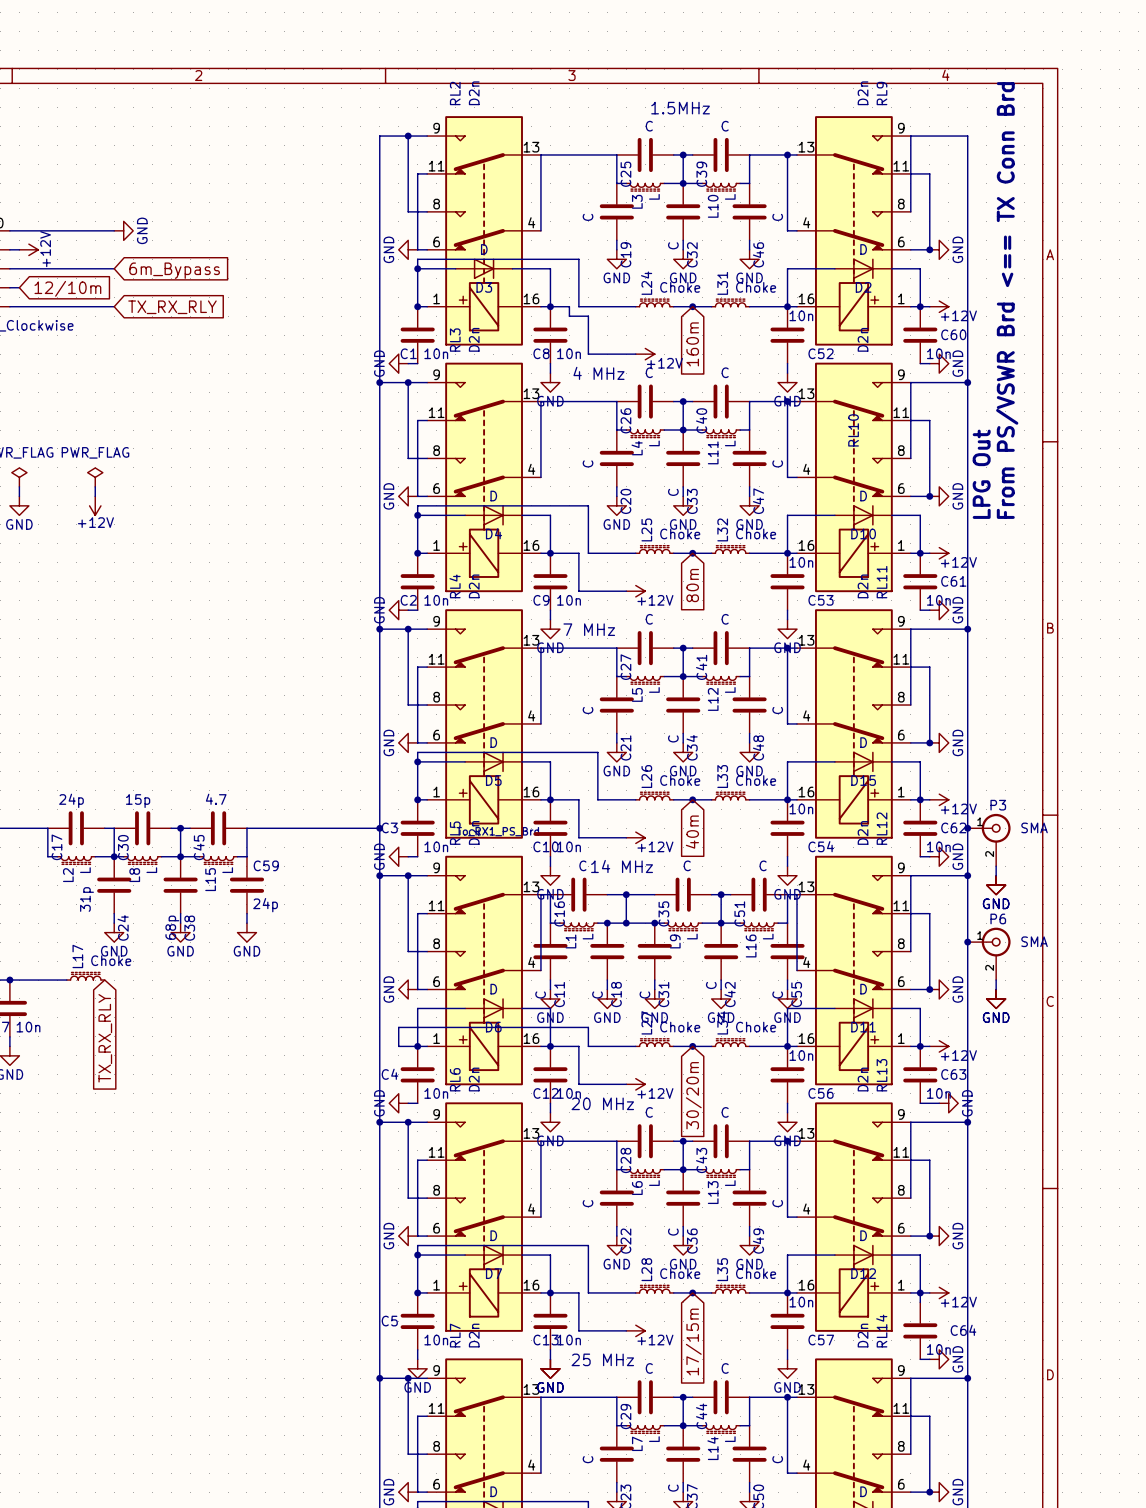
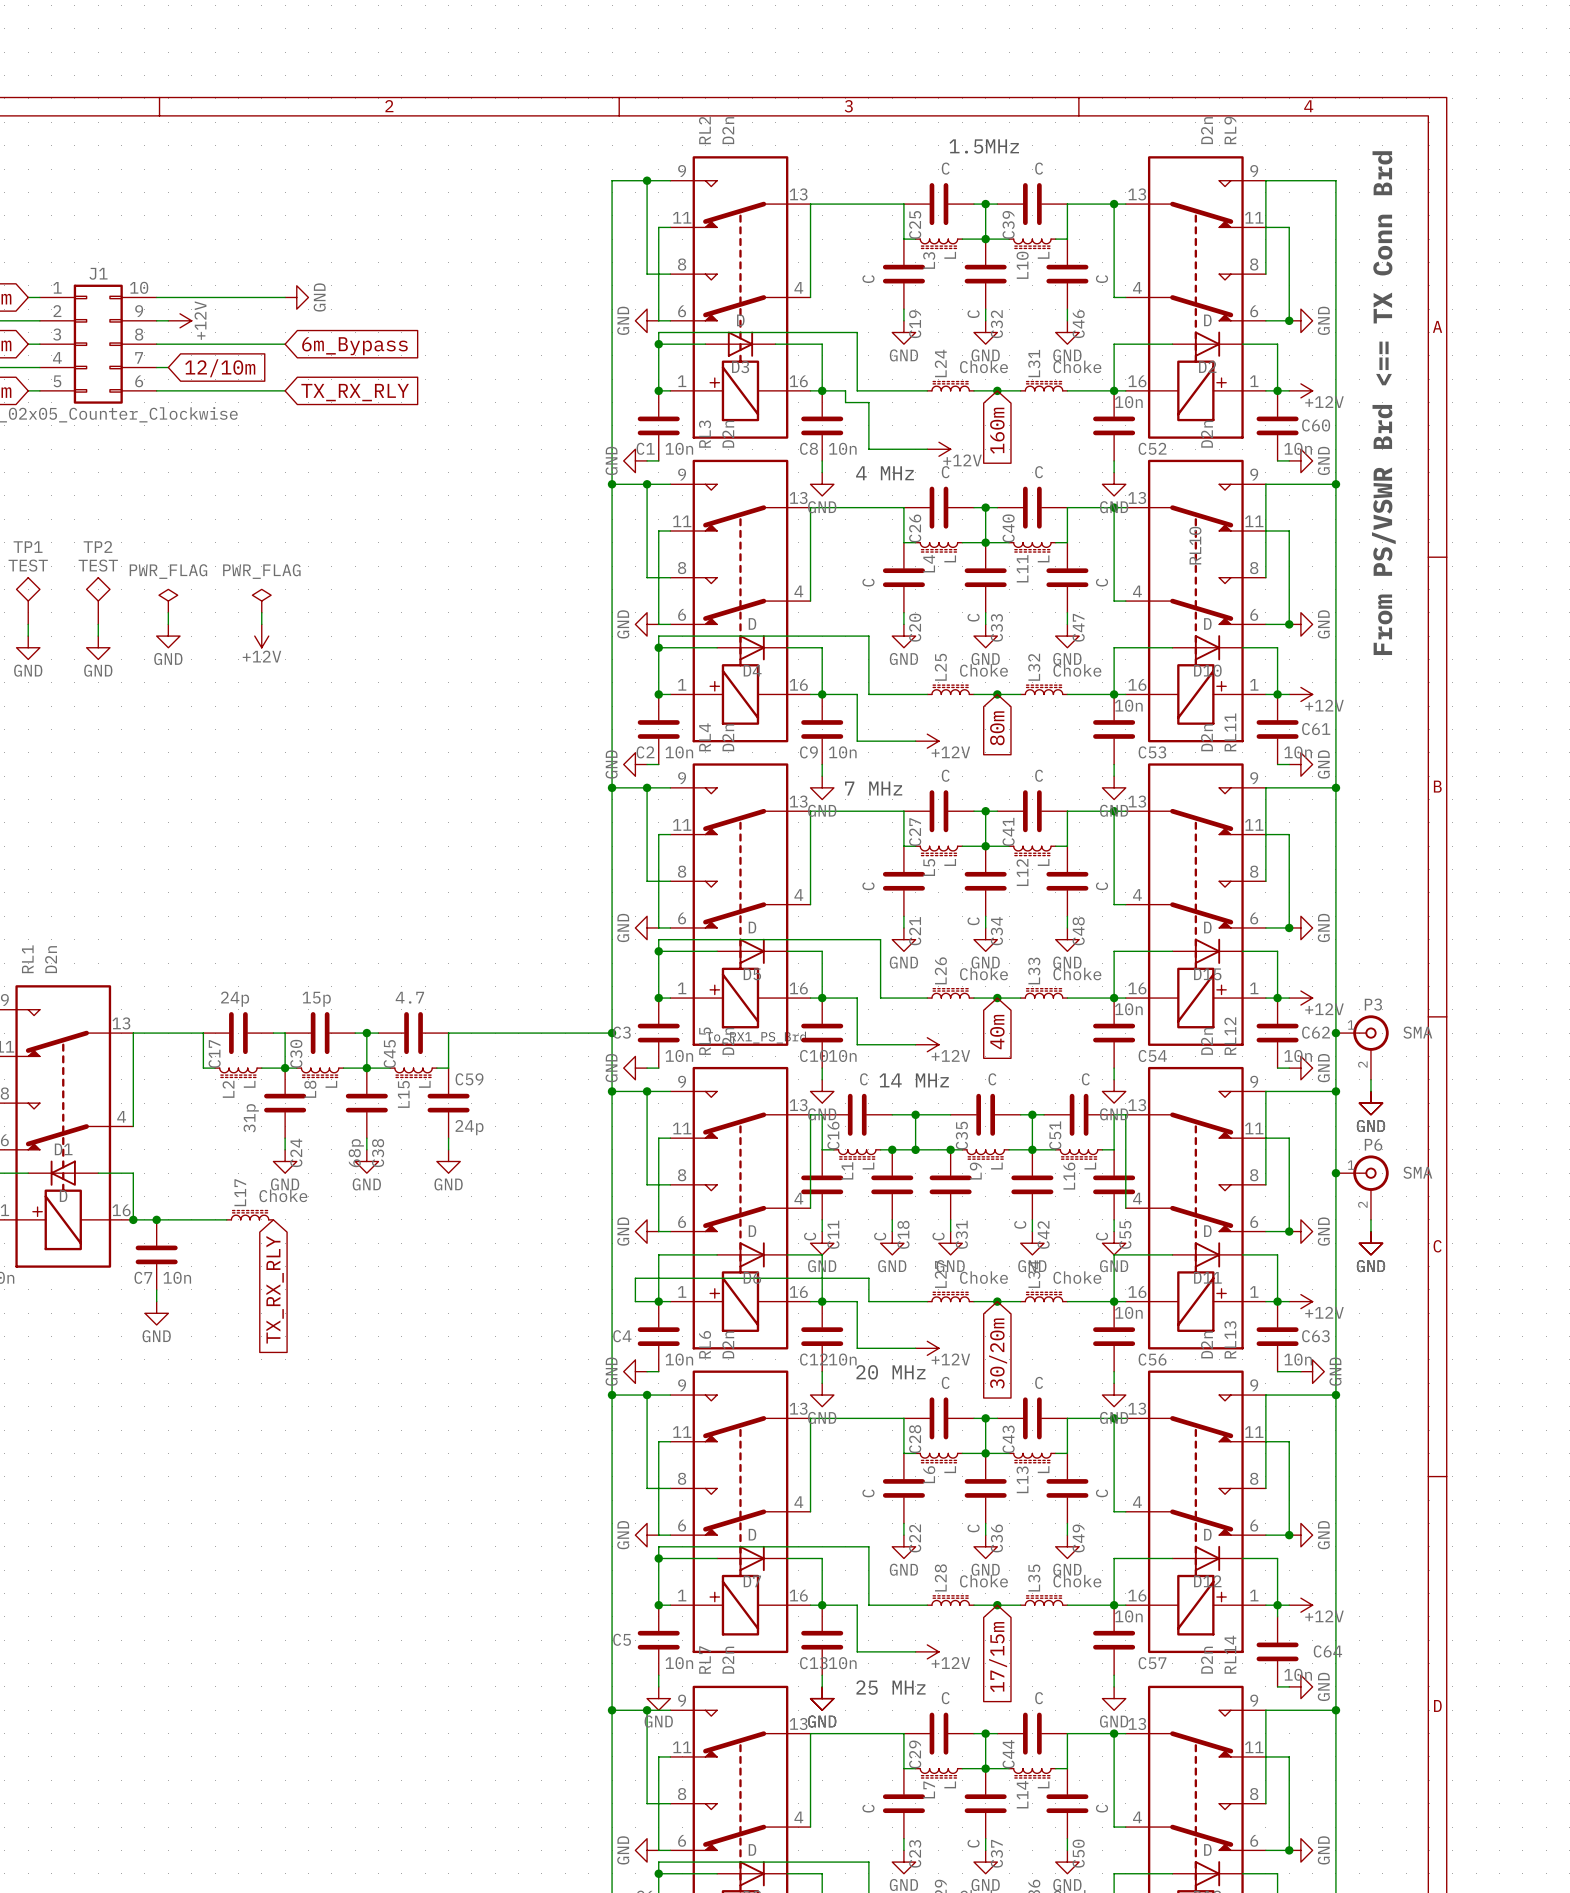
text: LPG Out (981, 474) -> none

